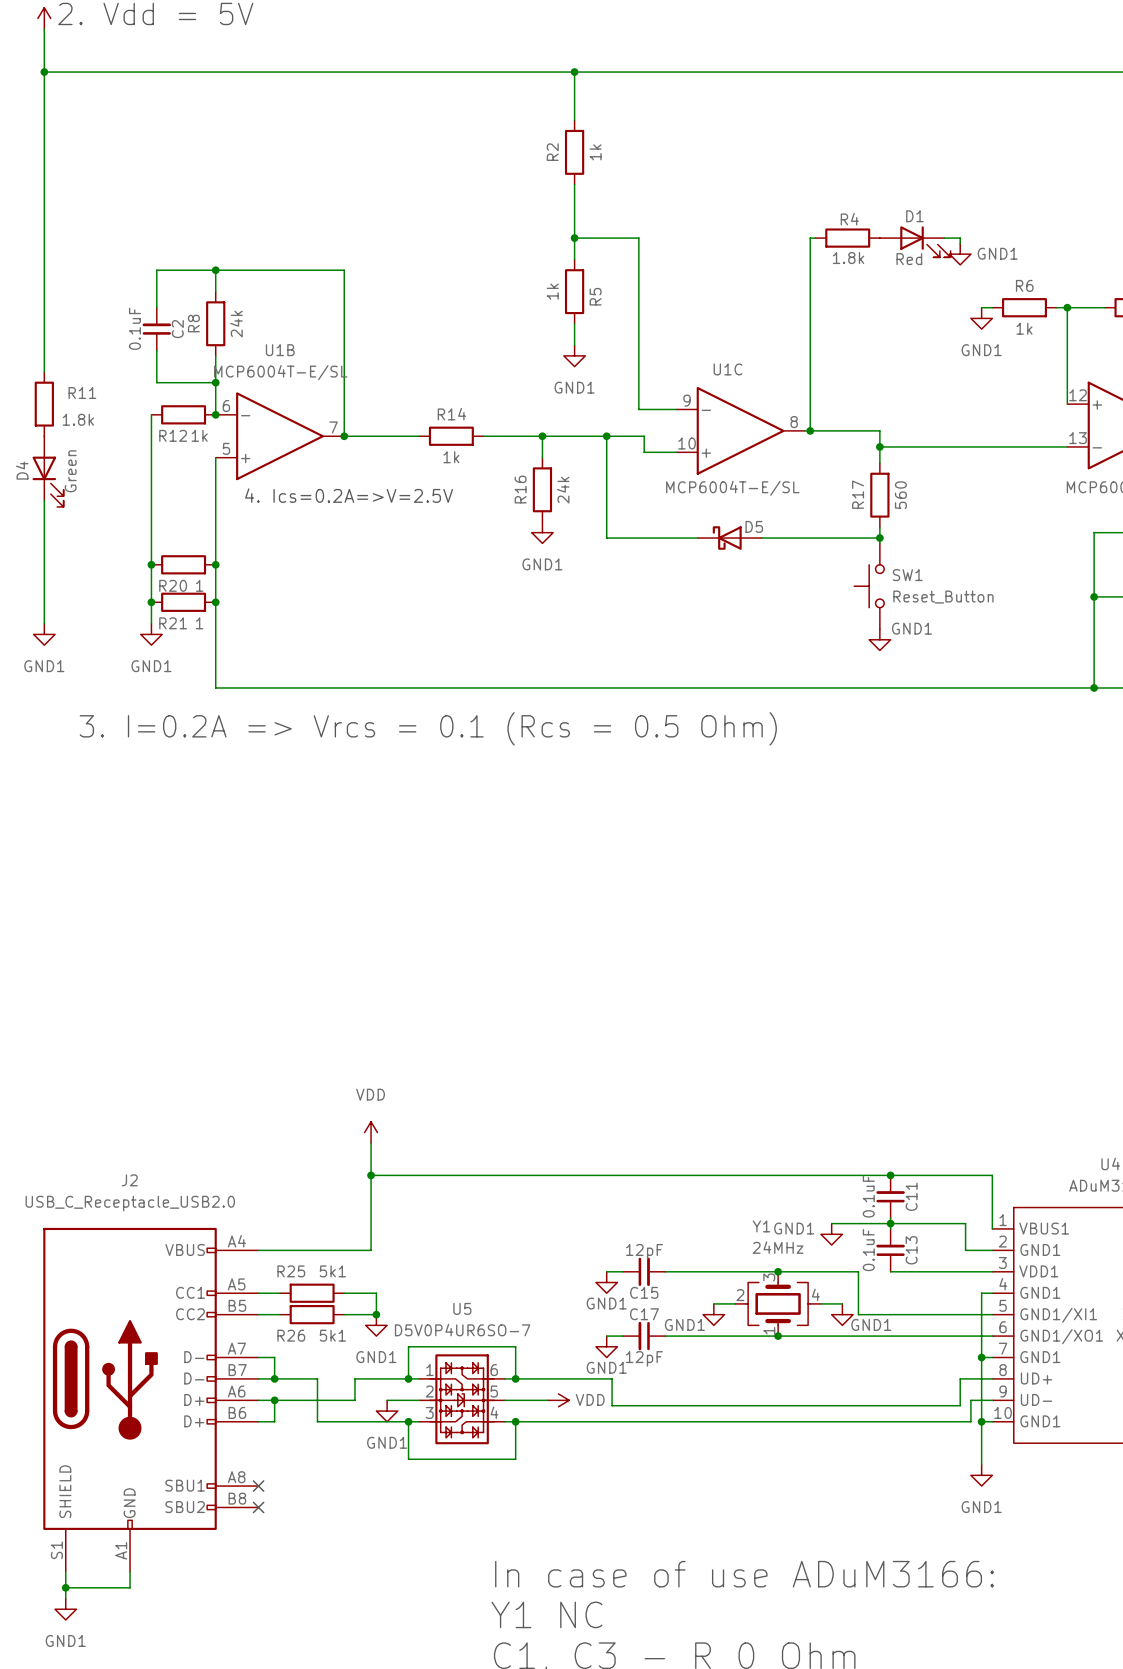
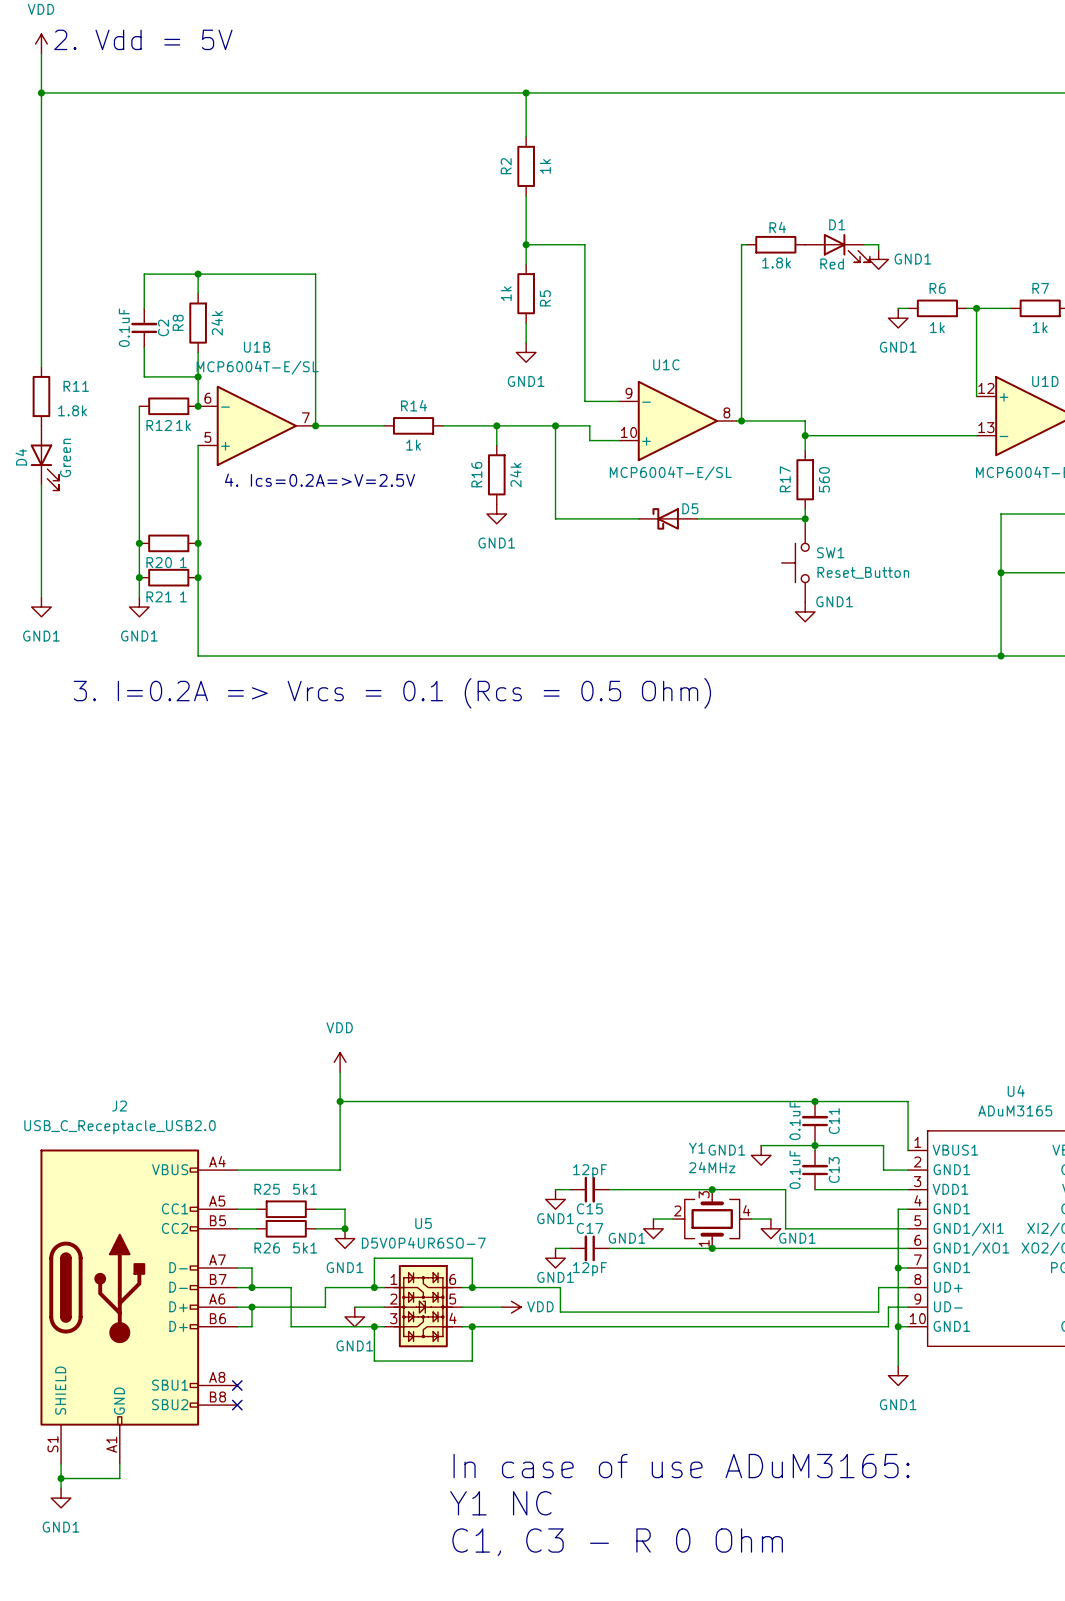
text: In case of use ADuM3166: (744, 1574) -> In case of use ADuM3165: (681, 1466)

